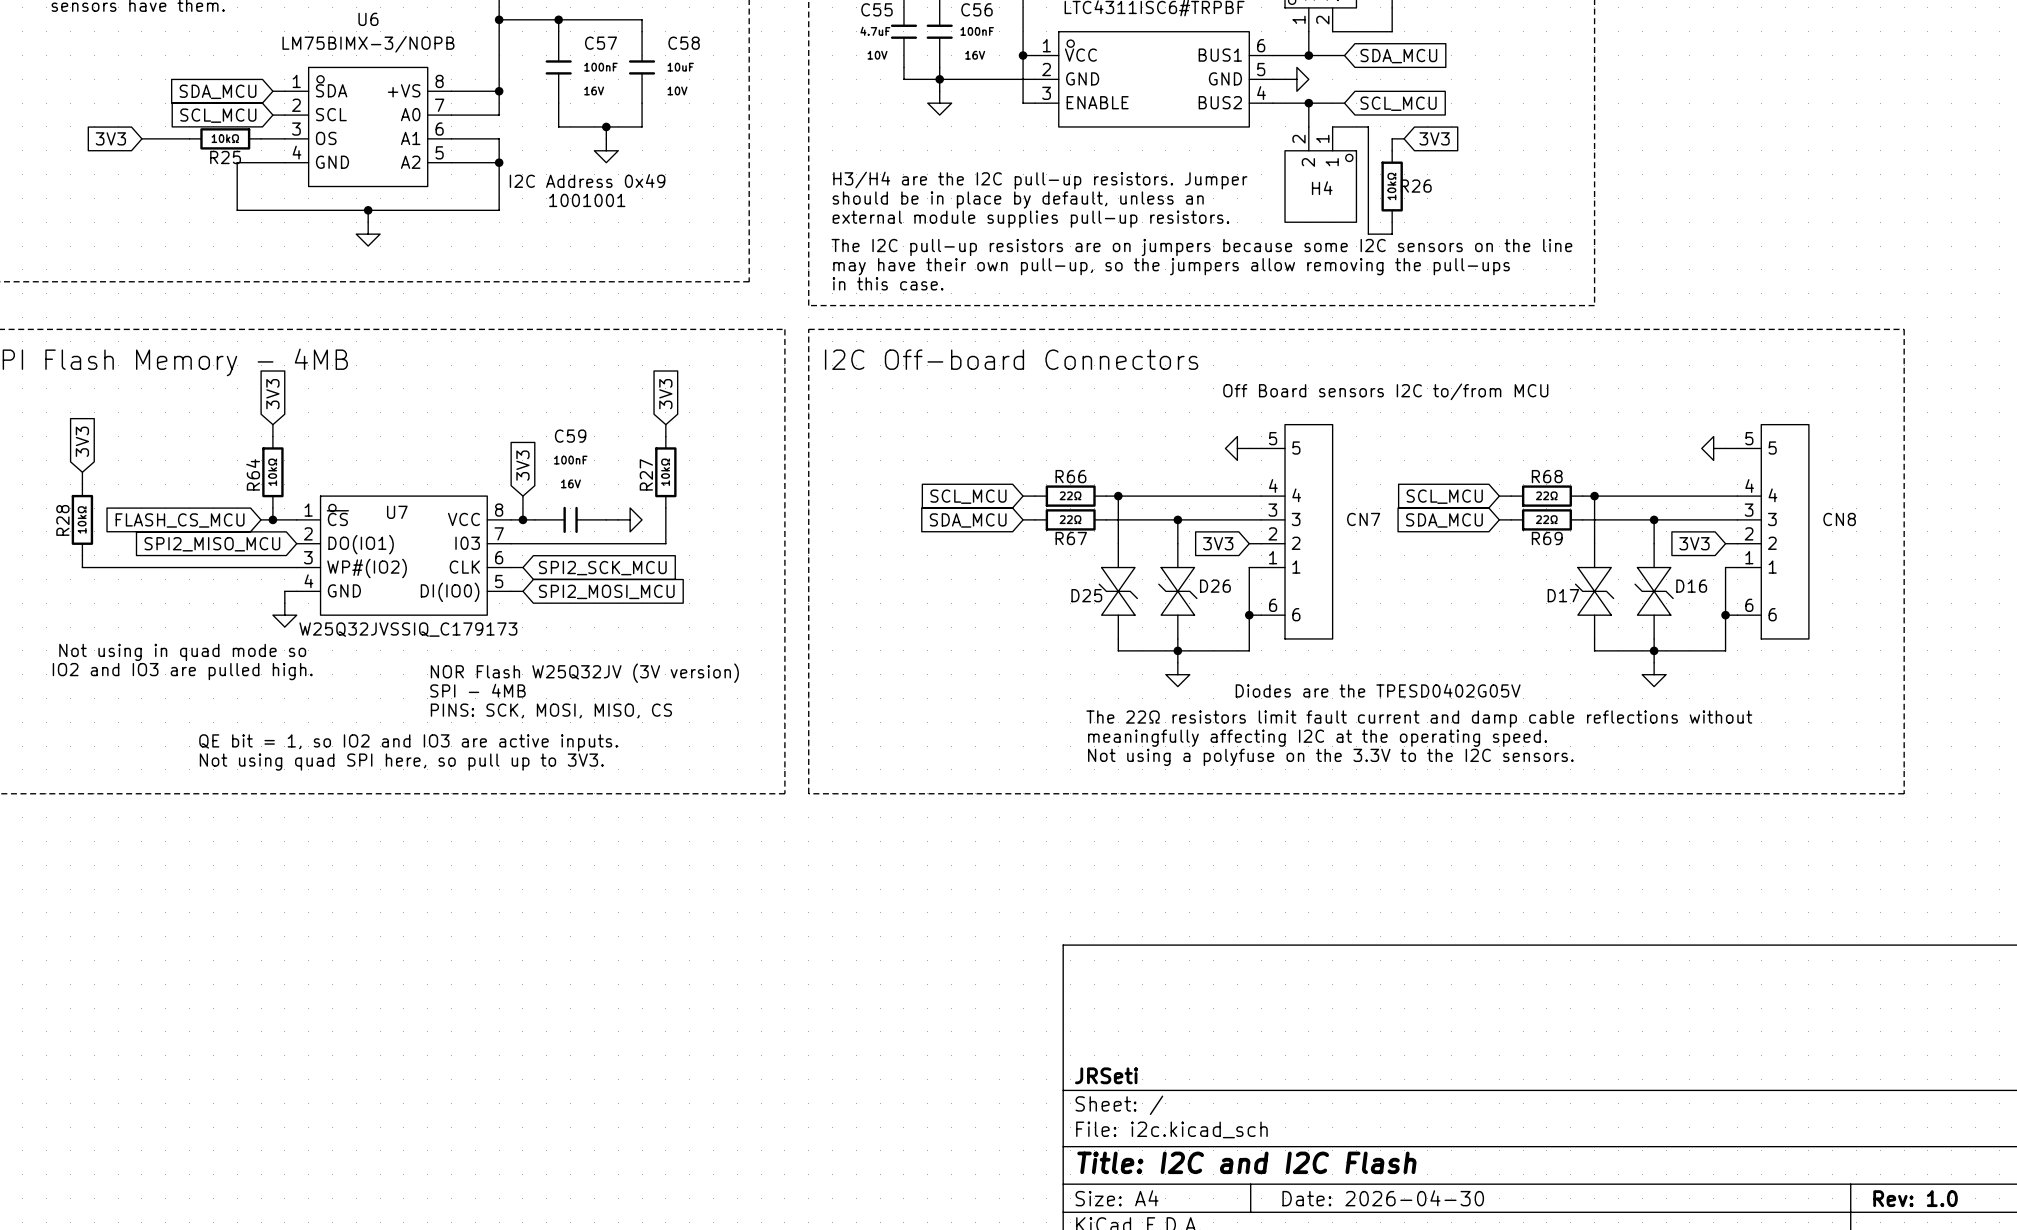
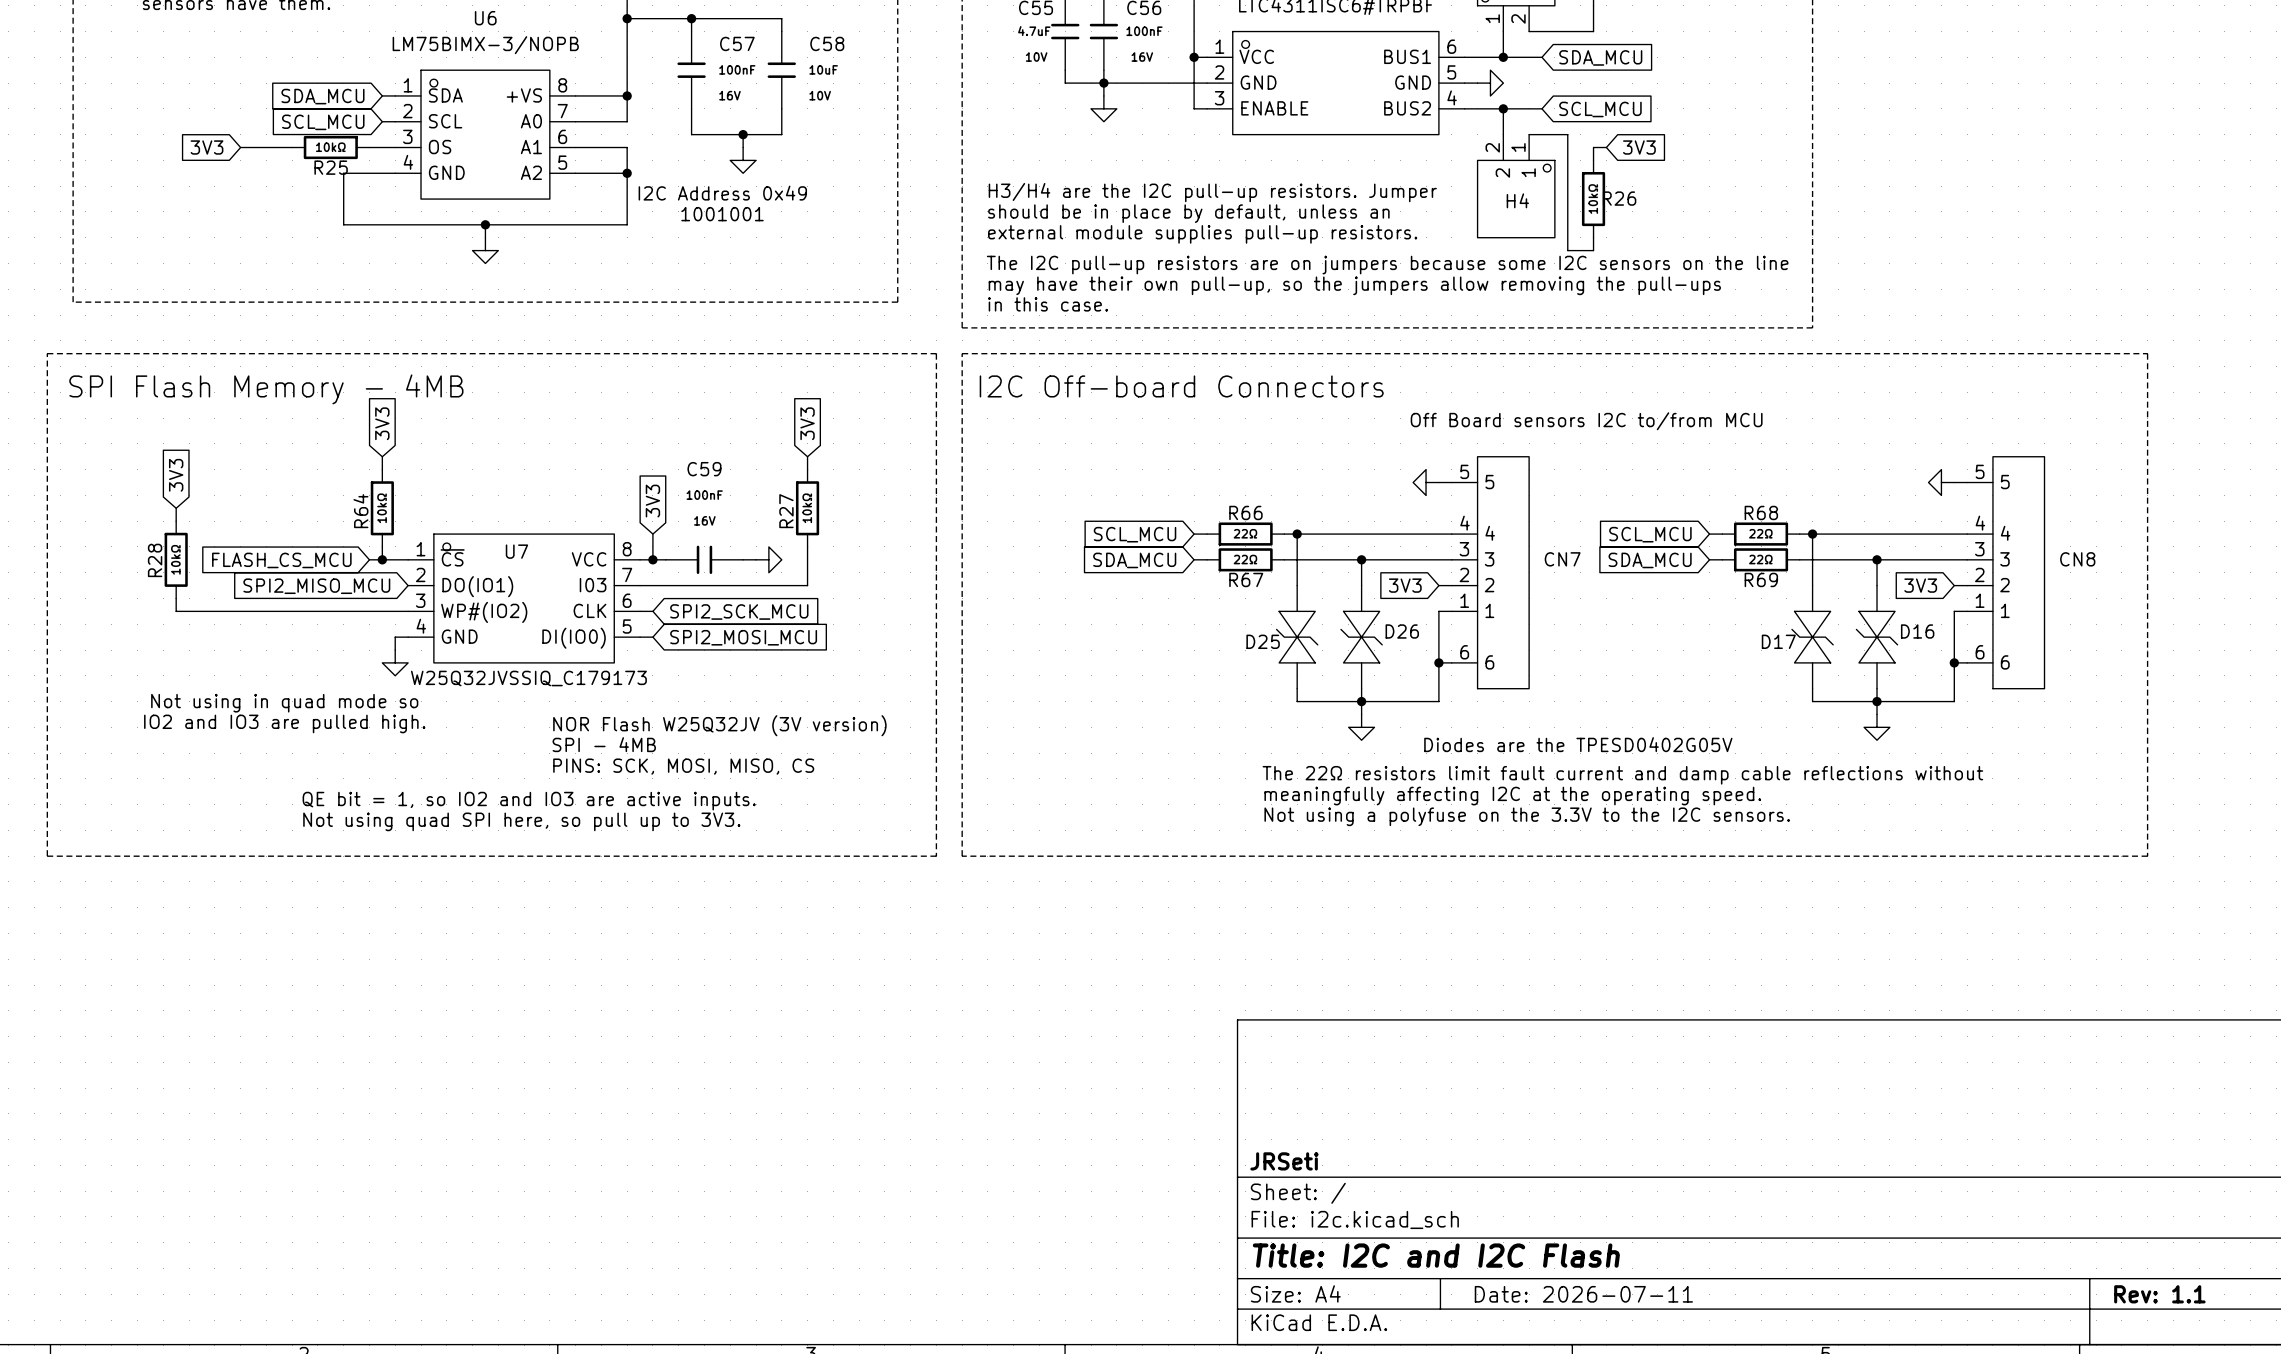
title block: Date: 2026-04-30 (1383, 1198) -> Date: 2026-07-11 (1583, 1294)
title block: Rev: 1.0 (1915, 1198) -> Rev: 1.1 (2159, 1294)

